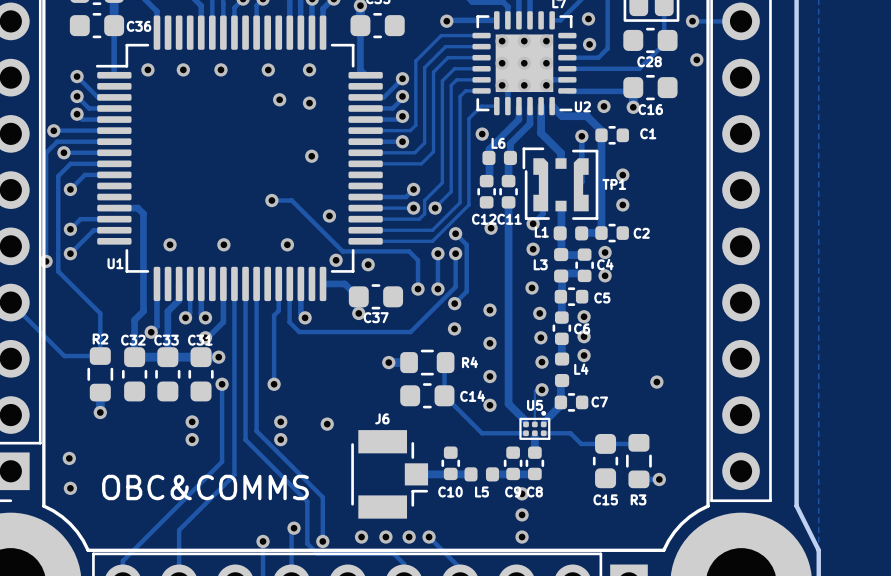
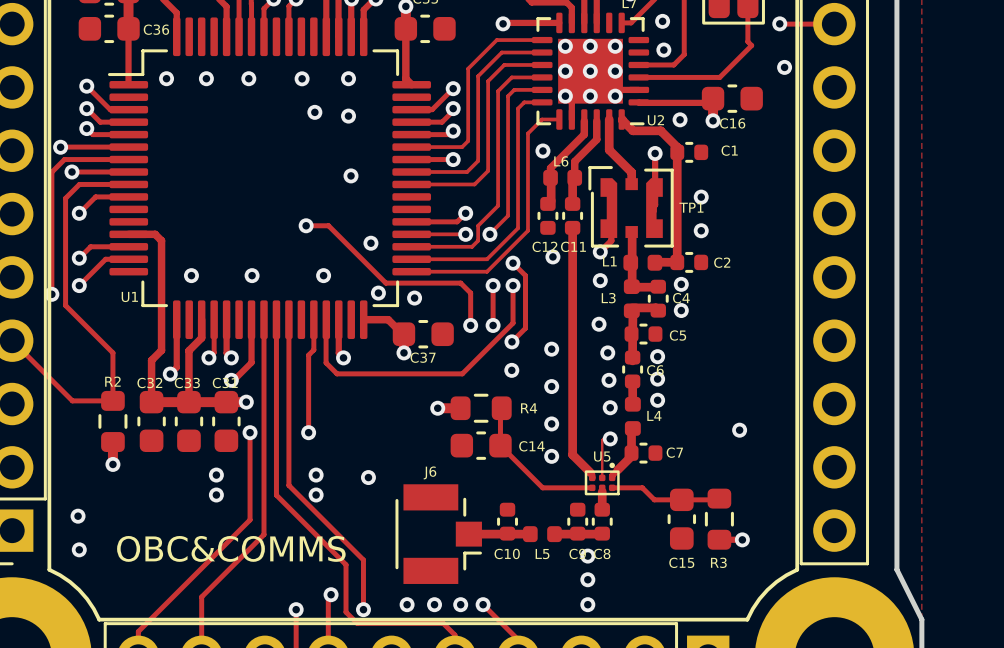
C28: (650, 40) -> none

